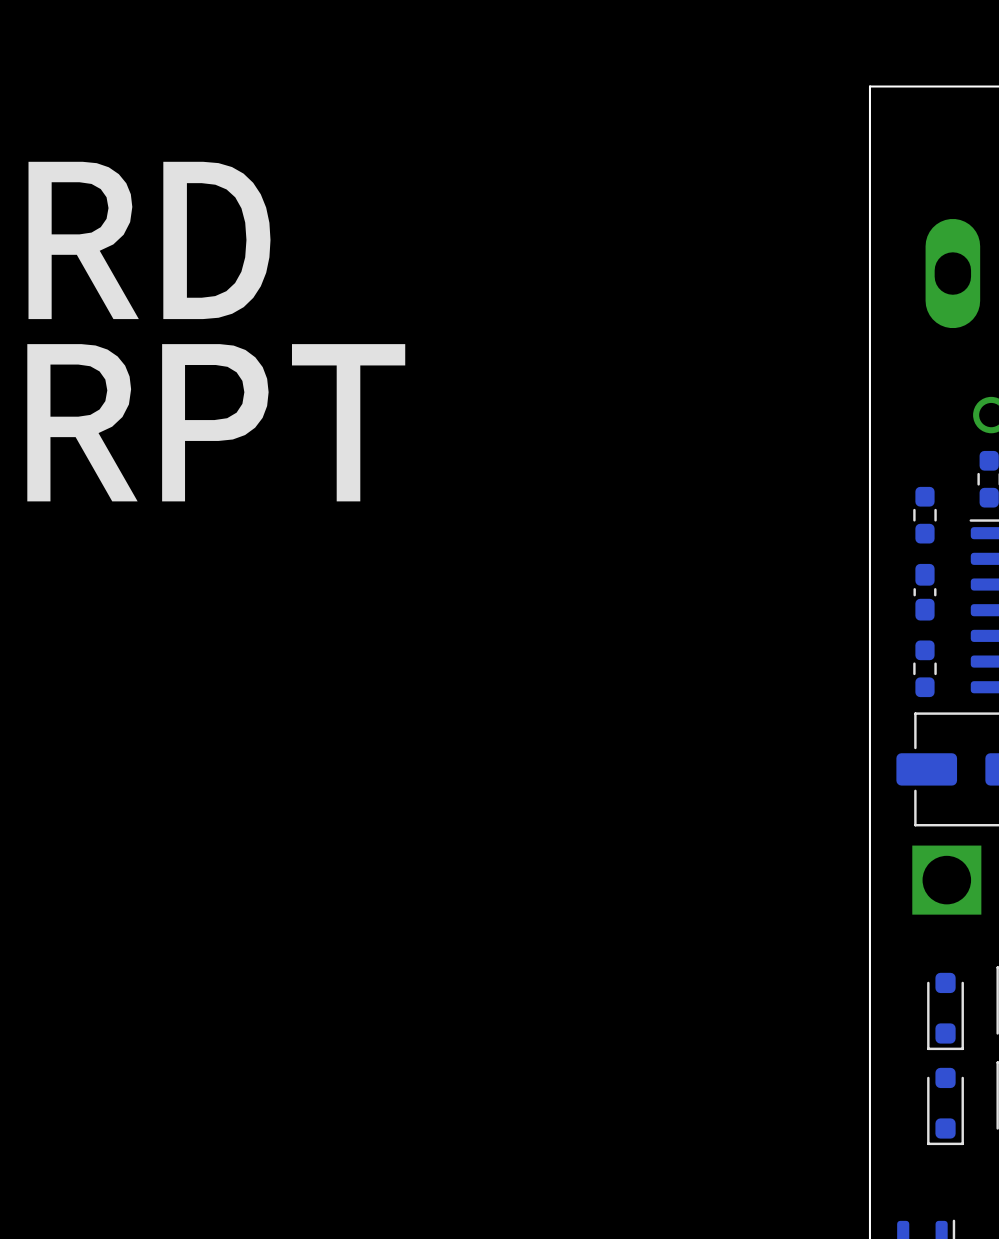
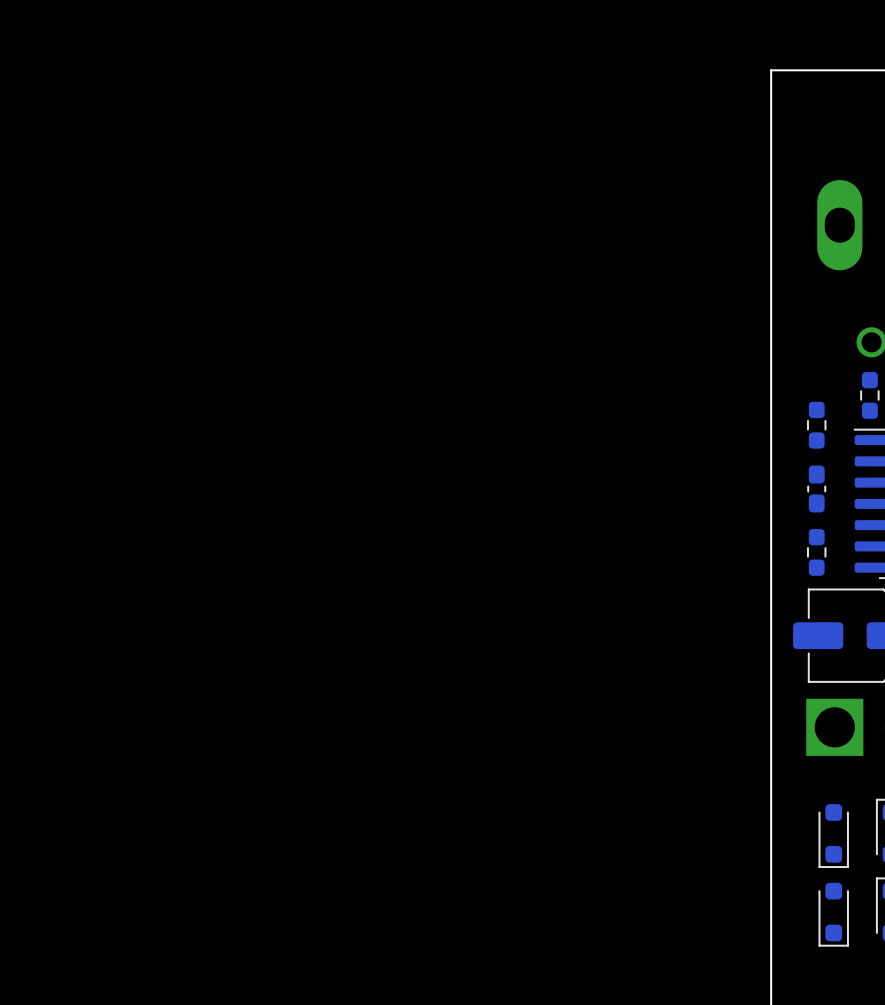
drawing: [28, 161, 271, 320] -> none
drawing: [27, 344, 406, 502] -> none

